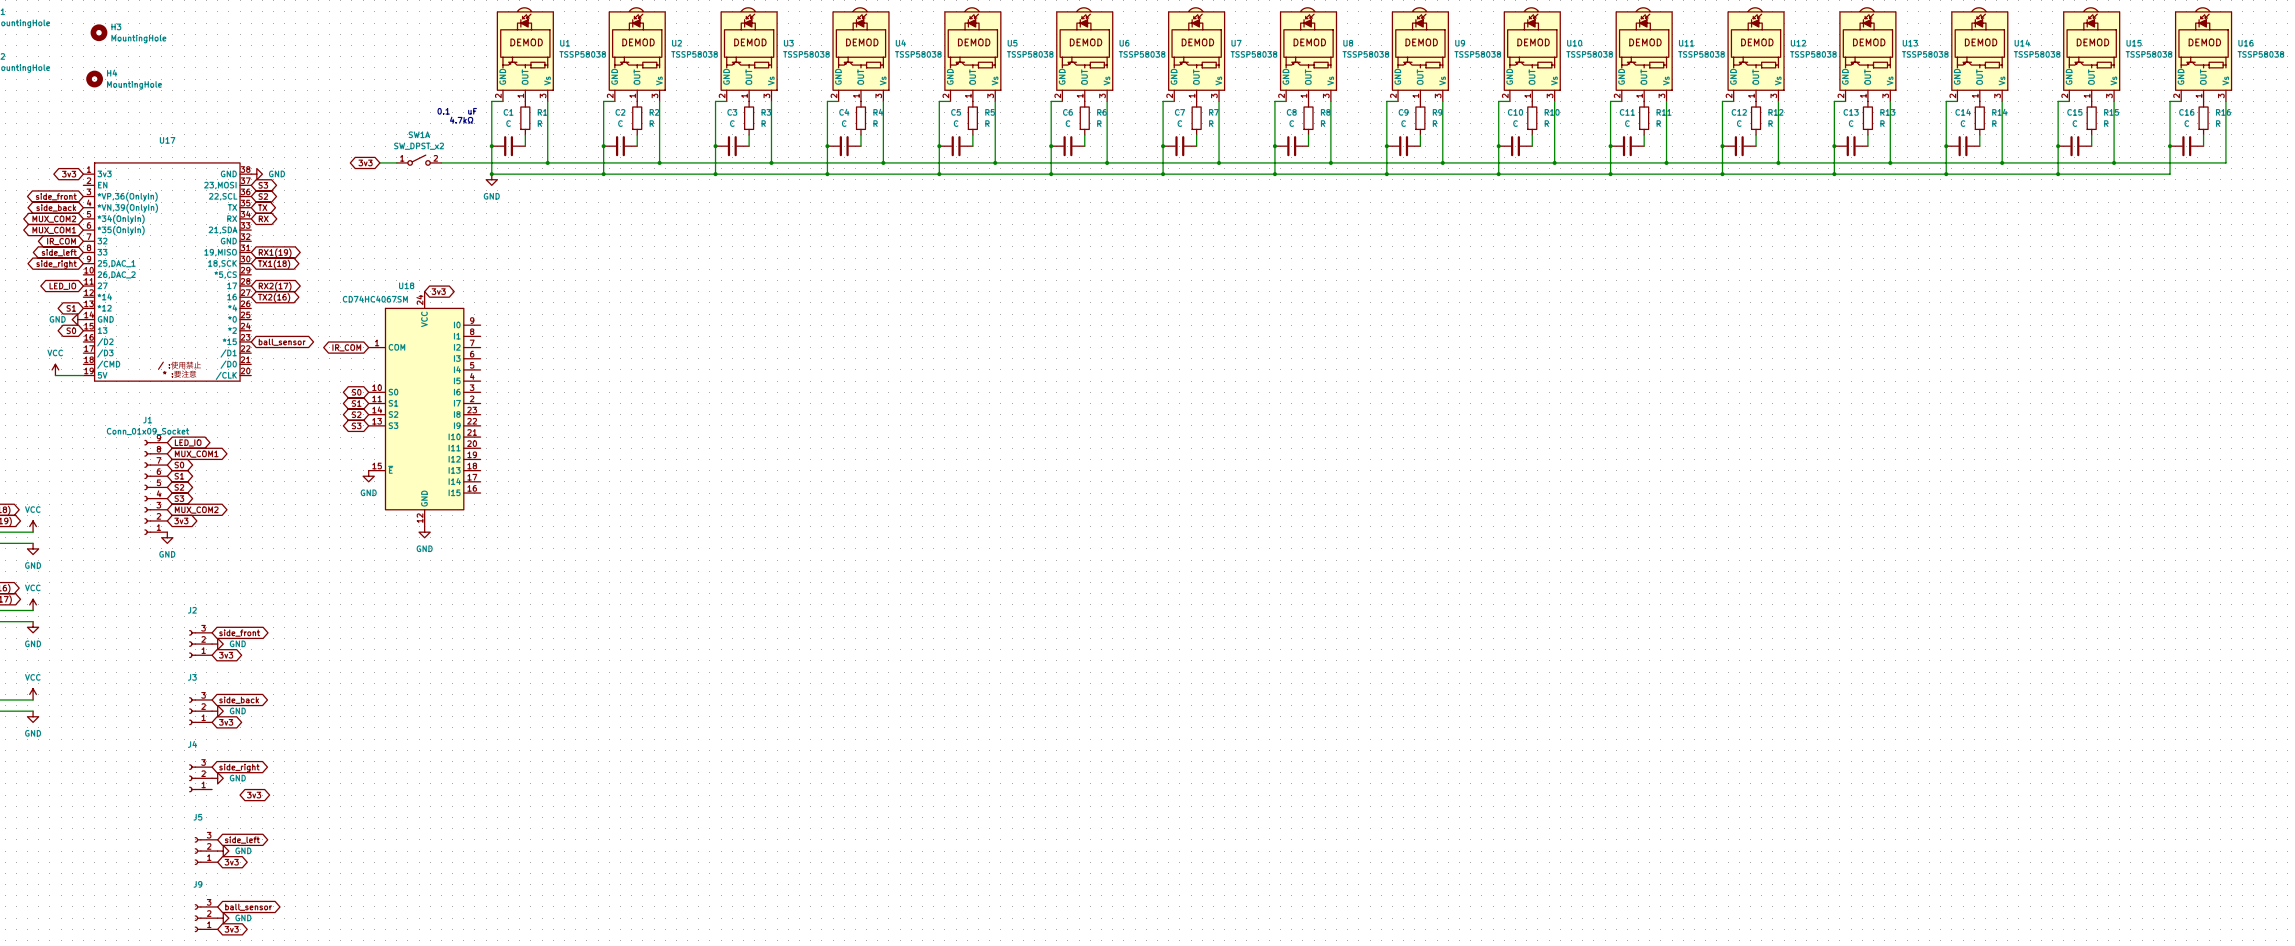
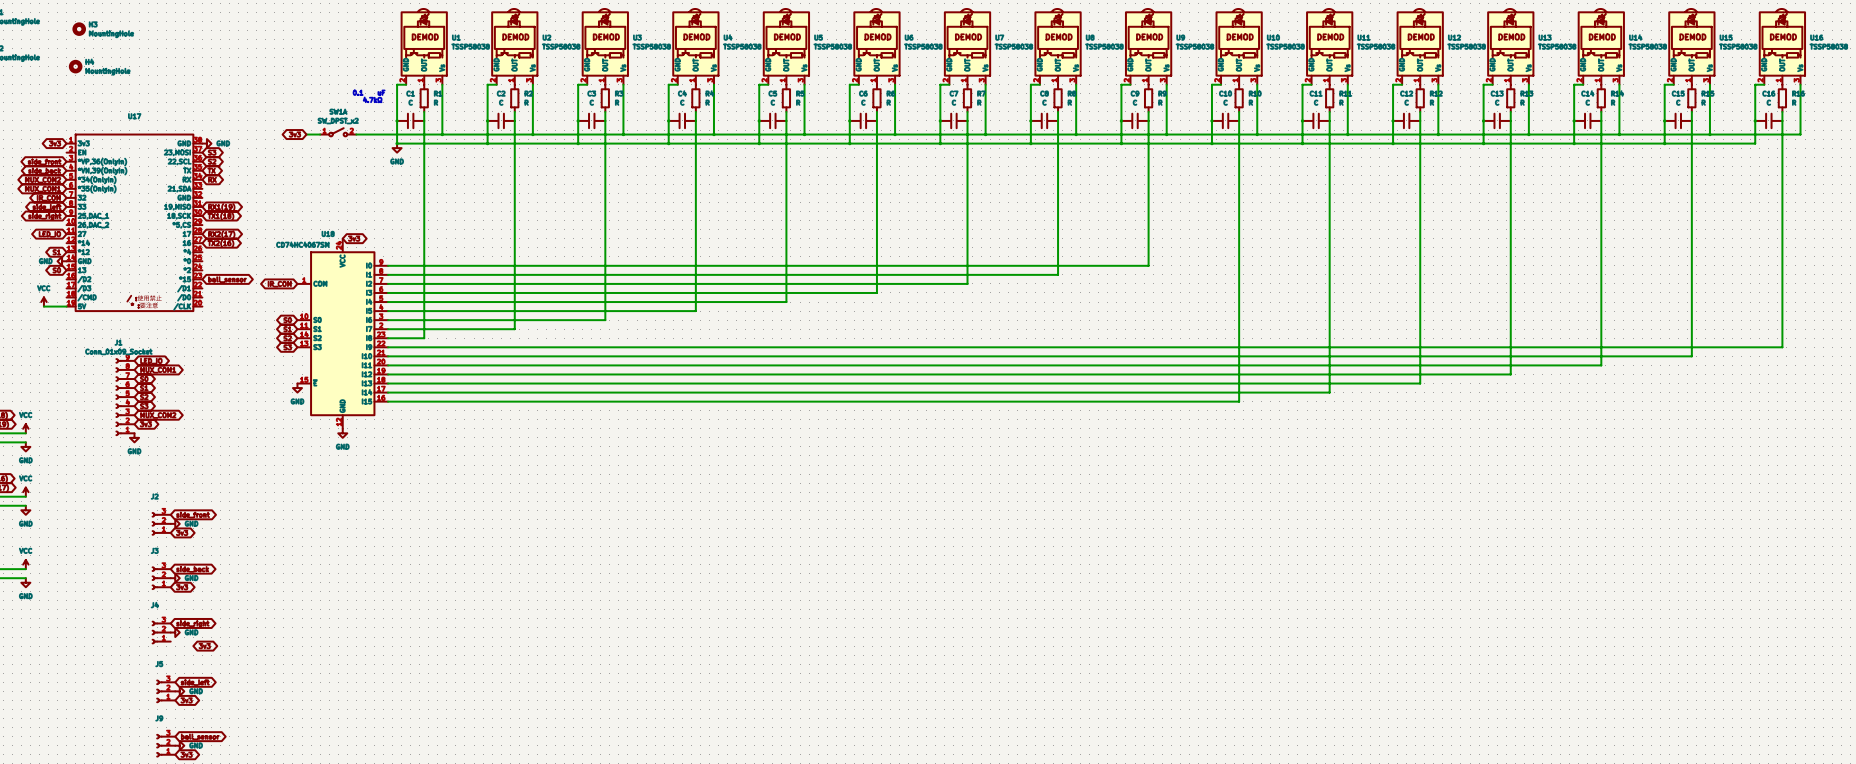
wire: none -> (424, 120) (424, 338) (388, 338)
wire: none -> (514, 120) (514, 329) (388, 329)
wire: none -> (605, 120) (605, 320) (388, 320)
wire: none -> (695, 120) (695, 311) (388, 311)
wire: none -> (786, 120) (786, 302) (388, 302)
wire: none -> (876, 120) (876, 292) (388, 292)
wire: none -> (967, 120) (967, 283) (388, 283)
wire: none -> (1058, 120) (1058, 274) (388, 274)
wire: none -> (1148, 120) (1148, 265) (388, 265)
wire: none -> (1239, 120) (1239, 401) (388, 401)
wire: none -> (1329, 120) (1329, 392) (388, 392)
wire: none -> (1420, 120) (1420, 383) (388, 383)
wire: none -> (1510, 120) (1510, 374) (388, 374)
wire: none -> (1601, 120) (1601, 365) (388, 365)
wire: none -> (1691, 120) (1691, 356) (388, 356)
wire: none -> (1782, 120) (1782, 347) (388, 347)

